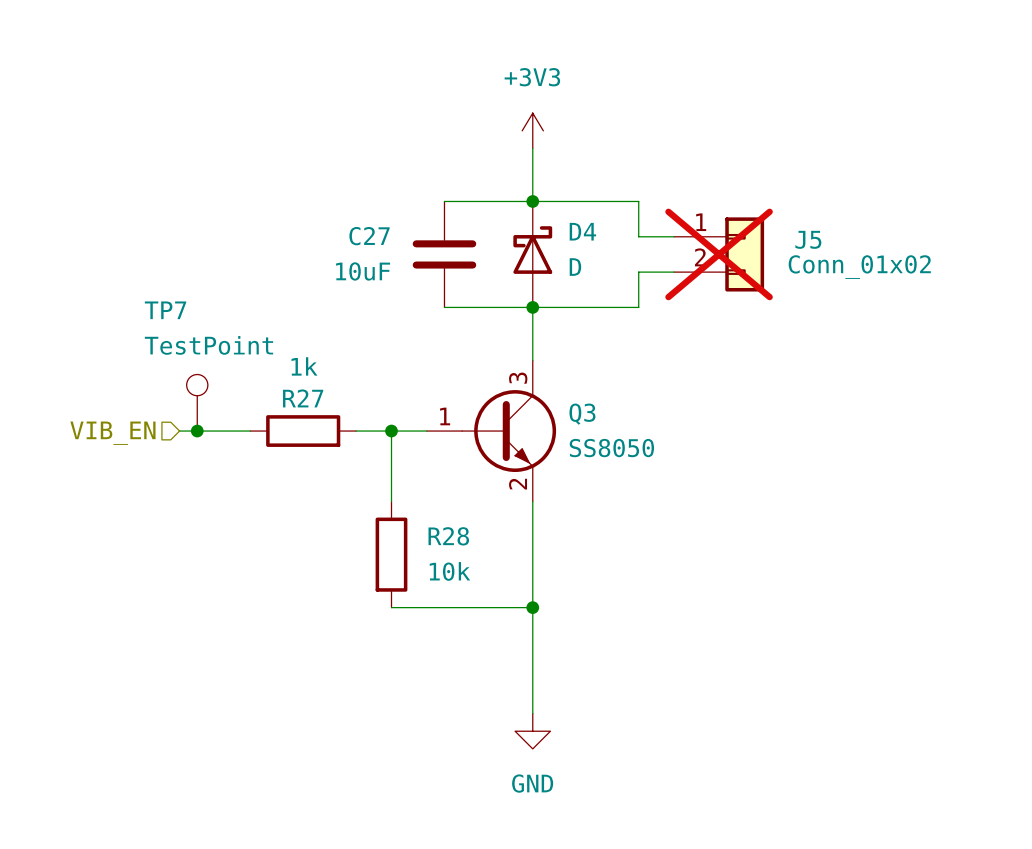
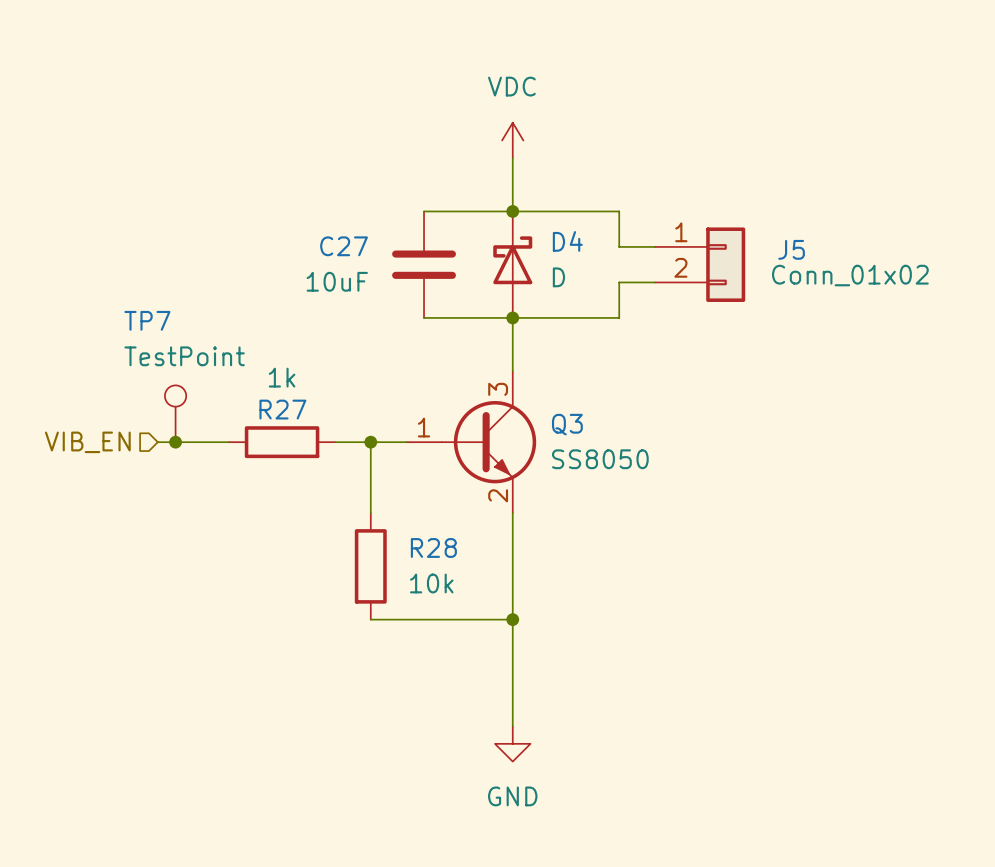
power symbol: +3V3 (532, 130) -> VDC (512, 140)
J5 do-not-place cross: (719, 254) -> none

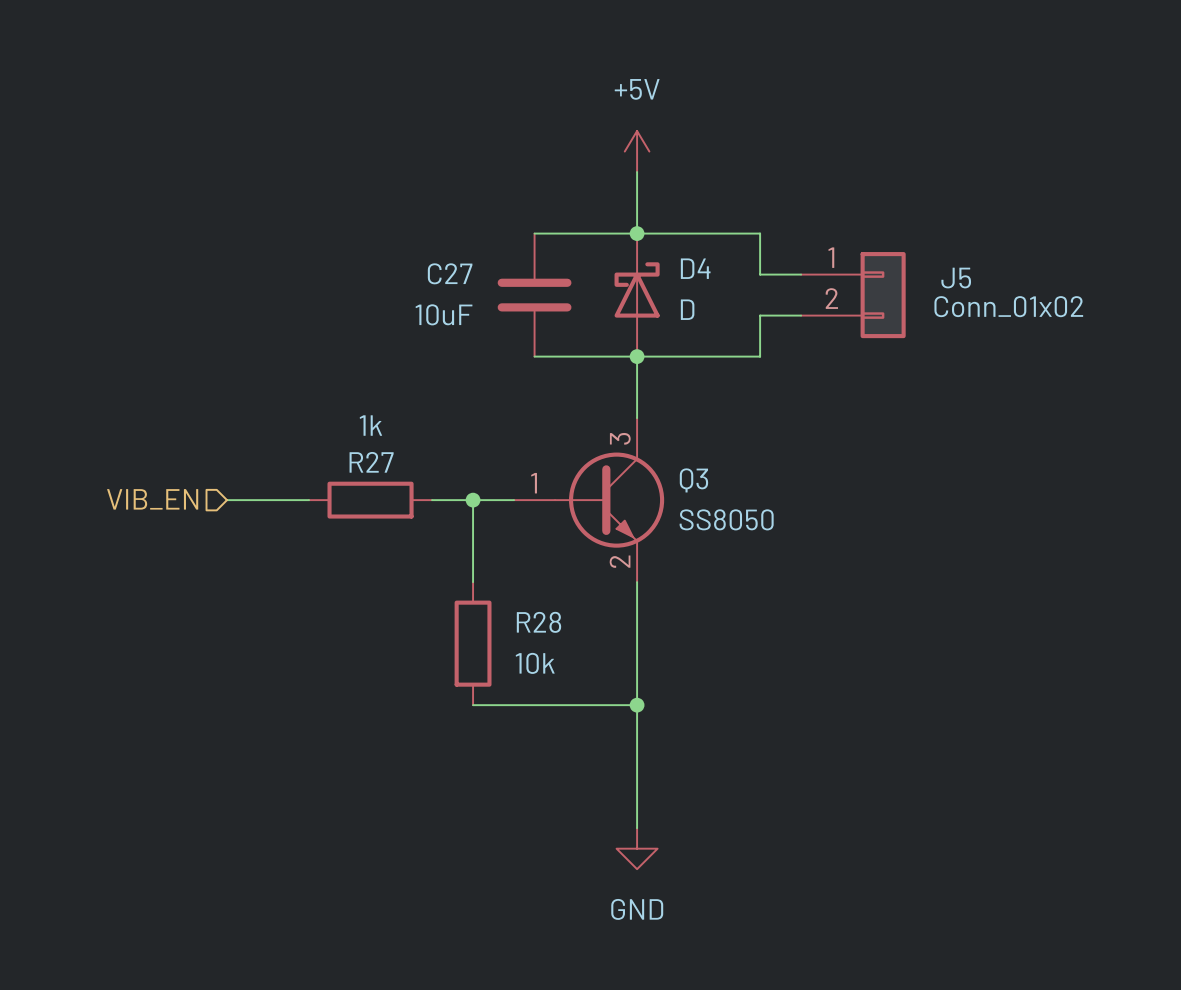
power symbol: VDC (512, 140) -> +5V (637, 151)
TP7: TestPoint (175, 413) -> none
junction: (175, 442) -> none

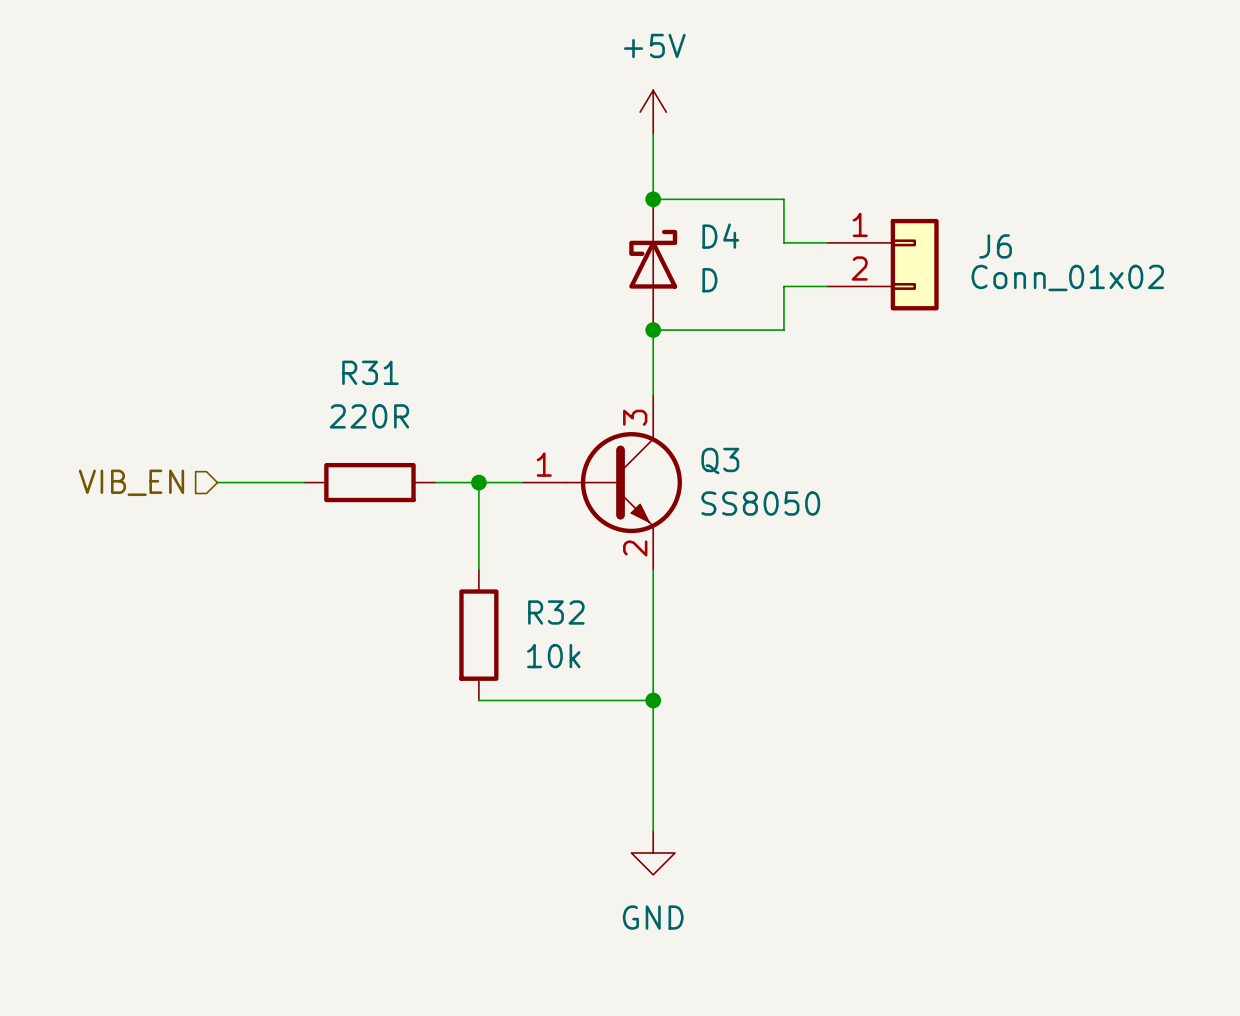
wire: (534, 233) (637, 233) -> none
J5 name: J5 (956, 278) -> J6 (995, 246)
C27: 10uF (534, 295) -> none
wire: (534, 356) (637, 356) -> none
R27 value: 1k (370, 425) -> 220R (369, 416)
R27 name: R27 (371, 462) -> R31 (370, 372)
R28 name: R28 (538, 622) -> R32 (556, 612)

